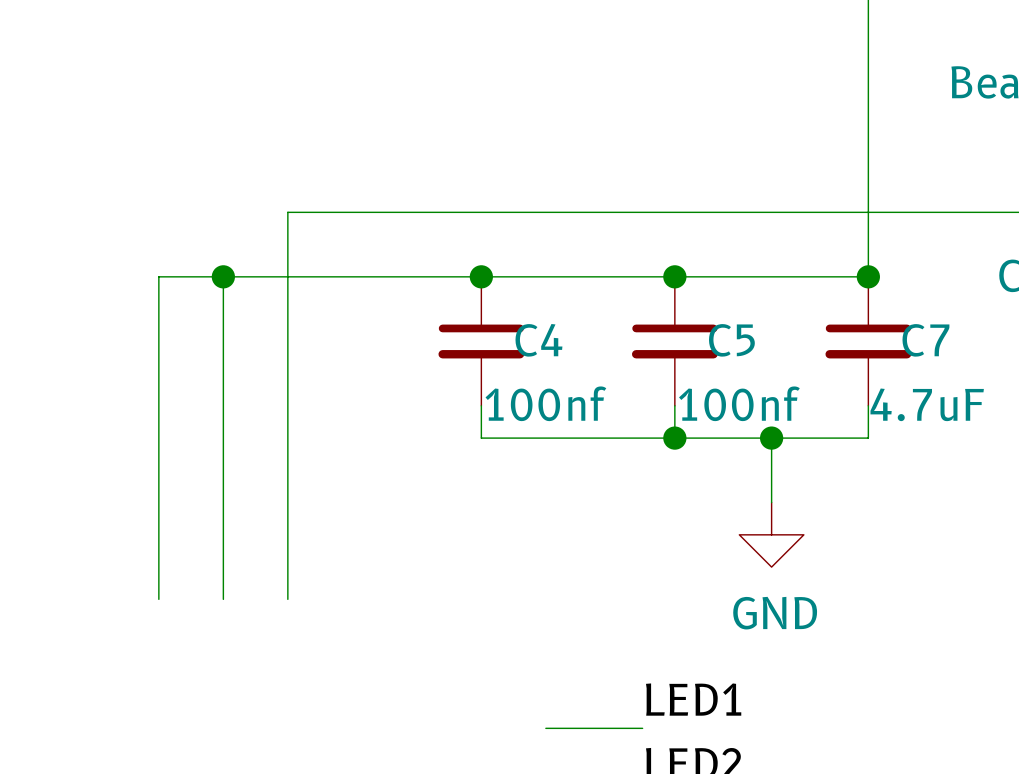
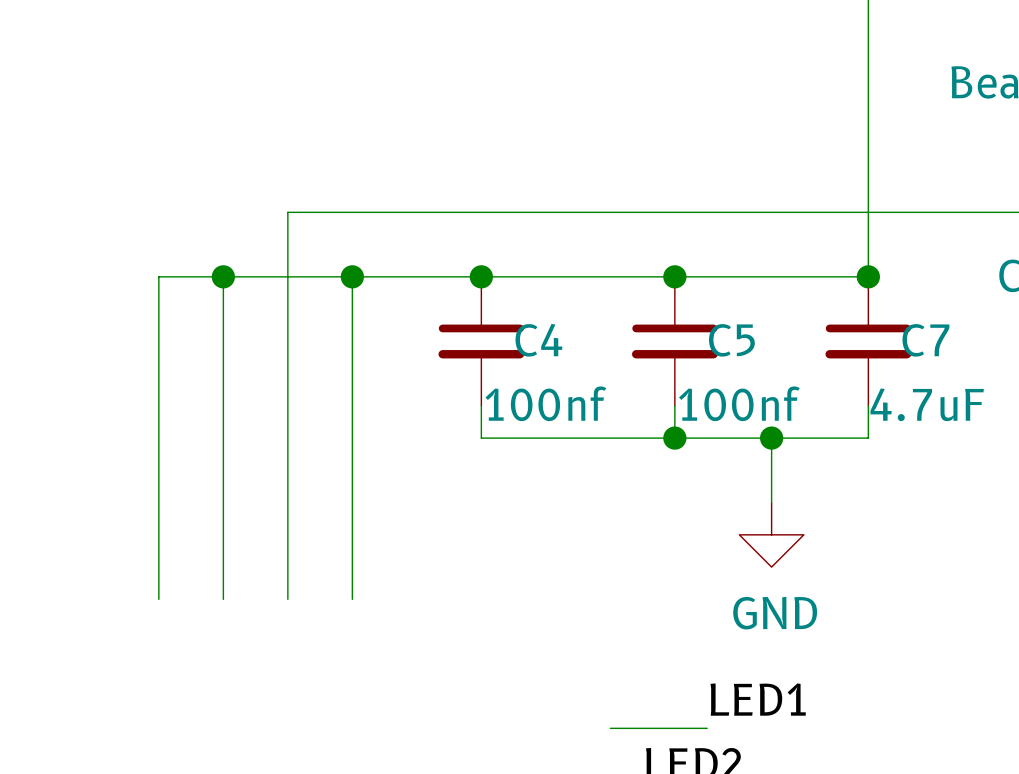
wire: none -> (352, 276) (352, 599)
junction: none -> (352, 276)
label position: LED1 (693, 699) -> LED1 (758, 699)
wire: (545, 728) (610, 728) -> (642, 728) (707, 728)

